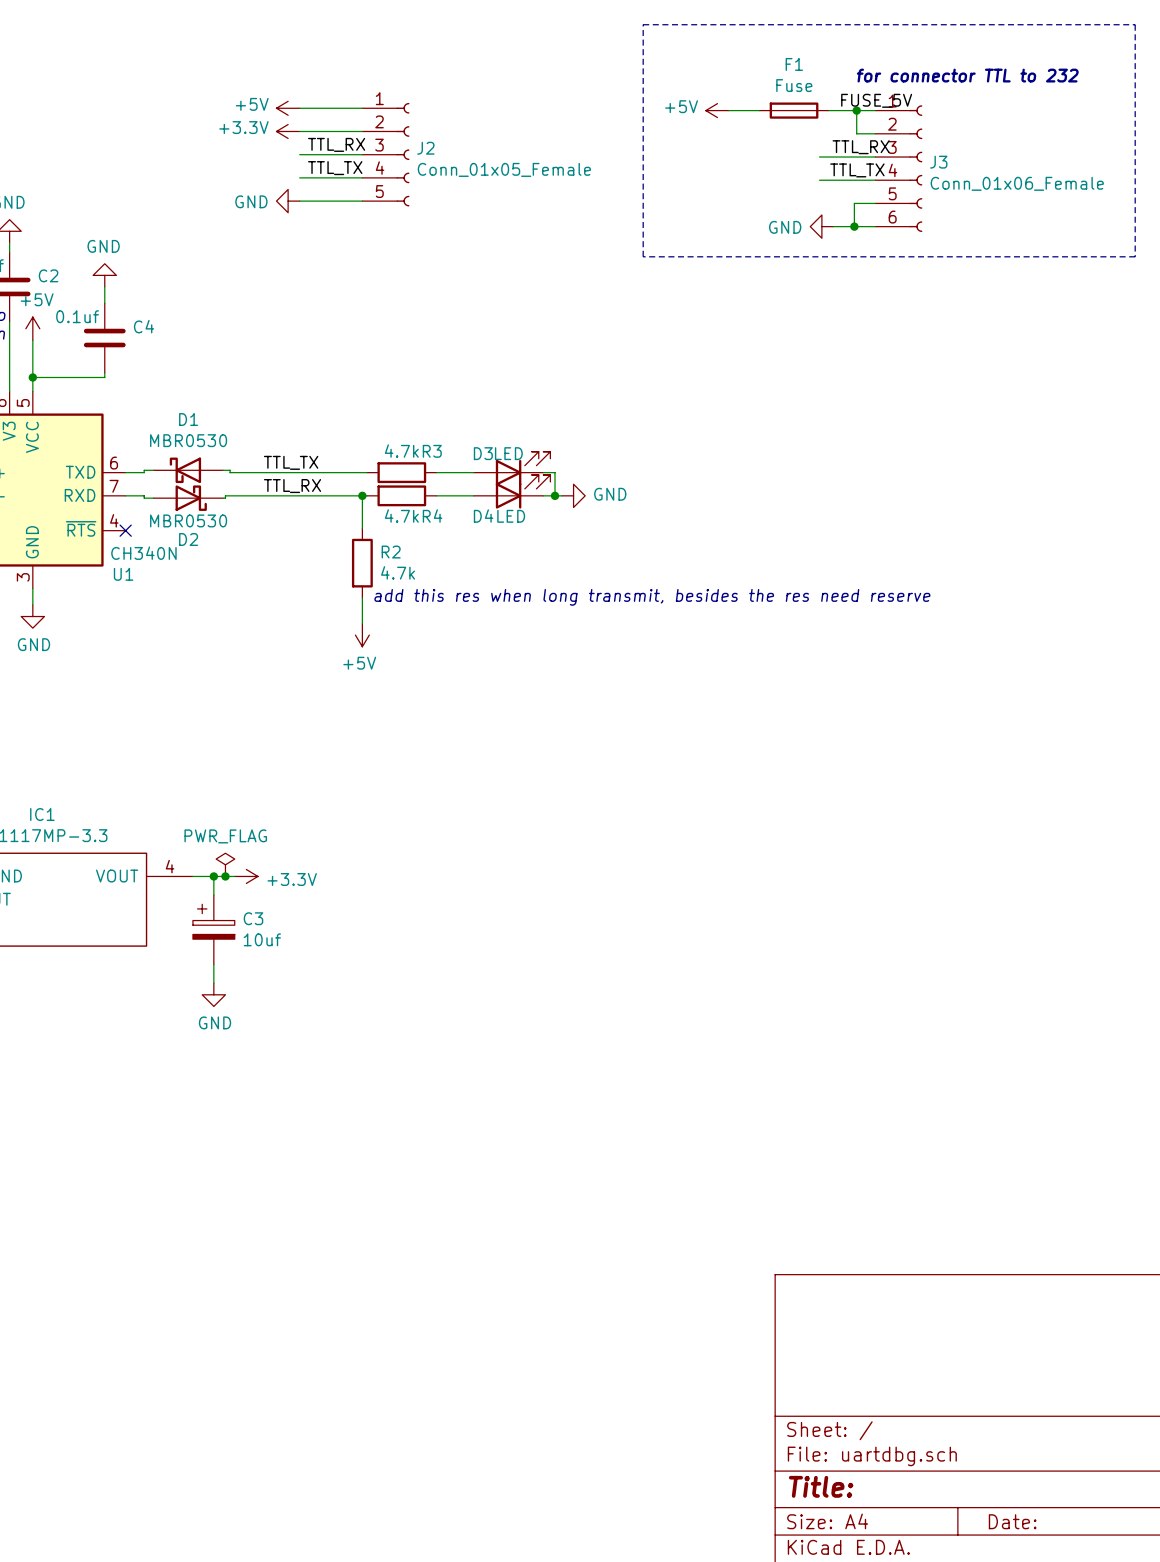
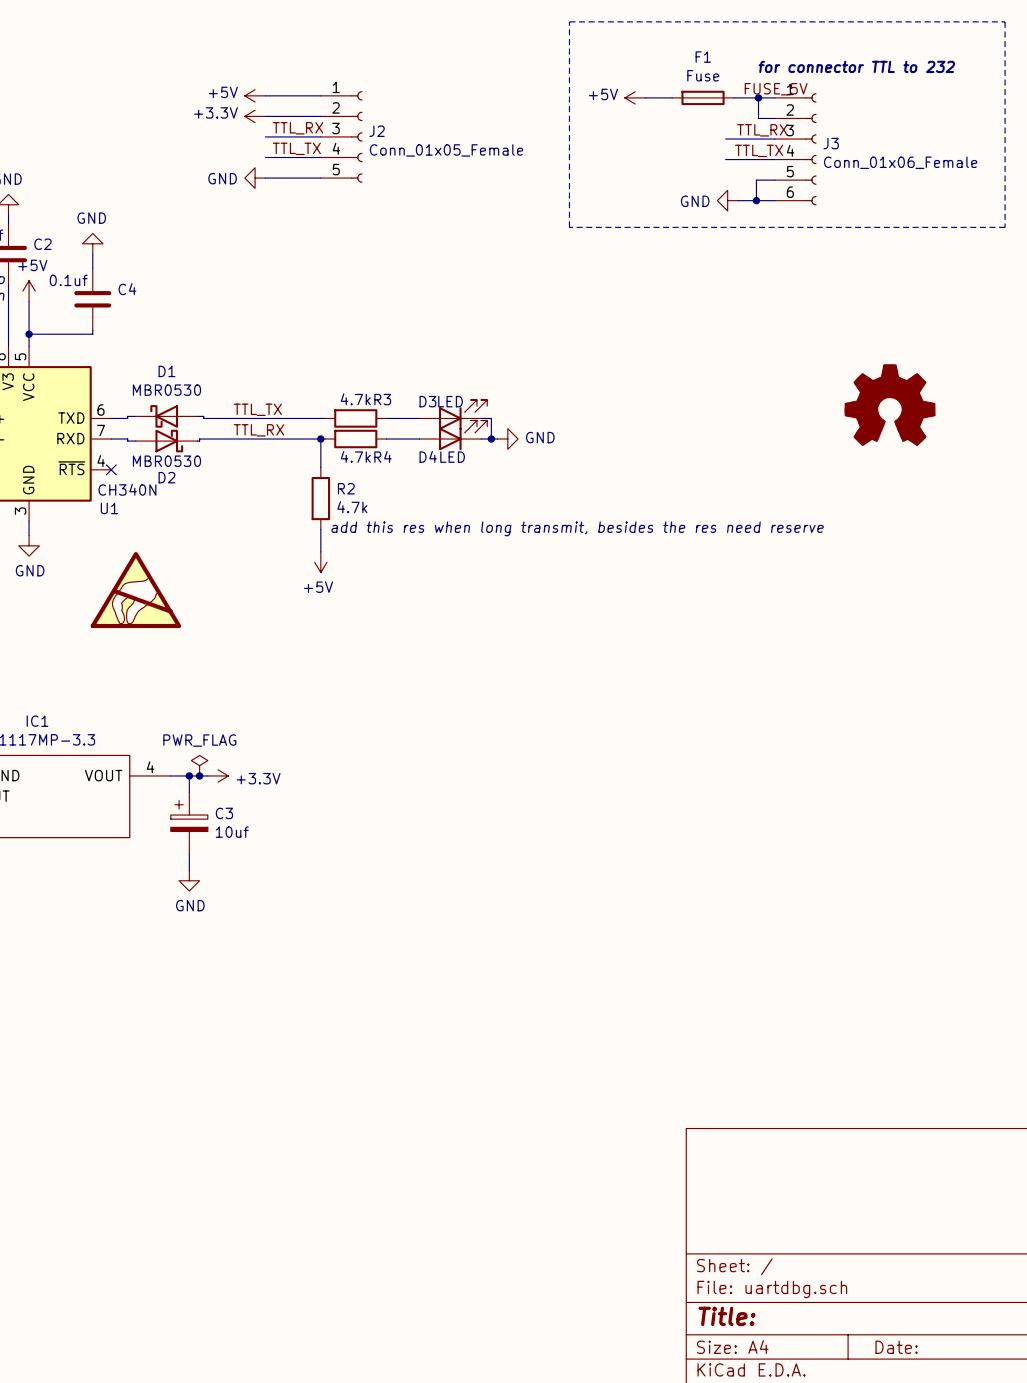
part: none -> (890, 405)
power symbol: none -> (135, 590)

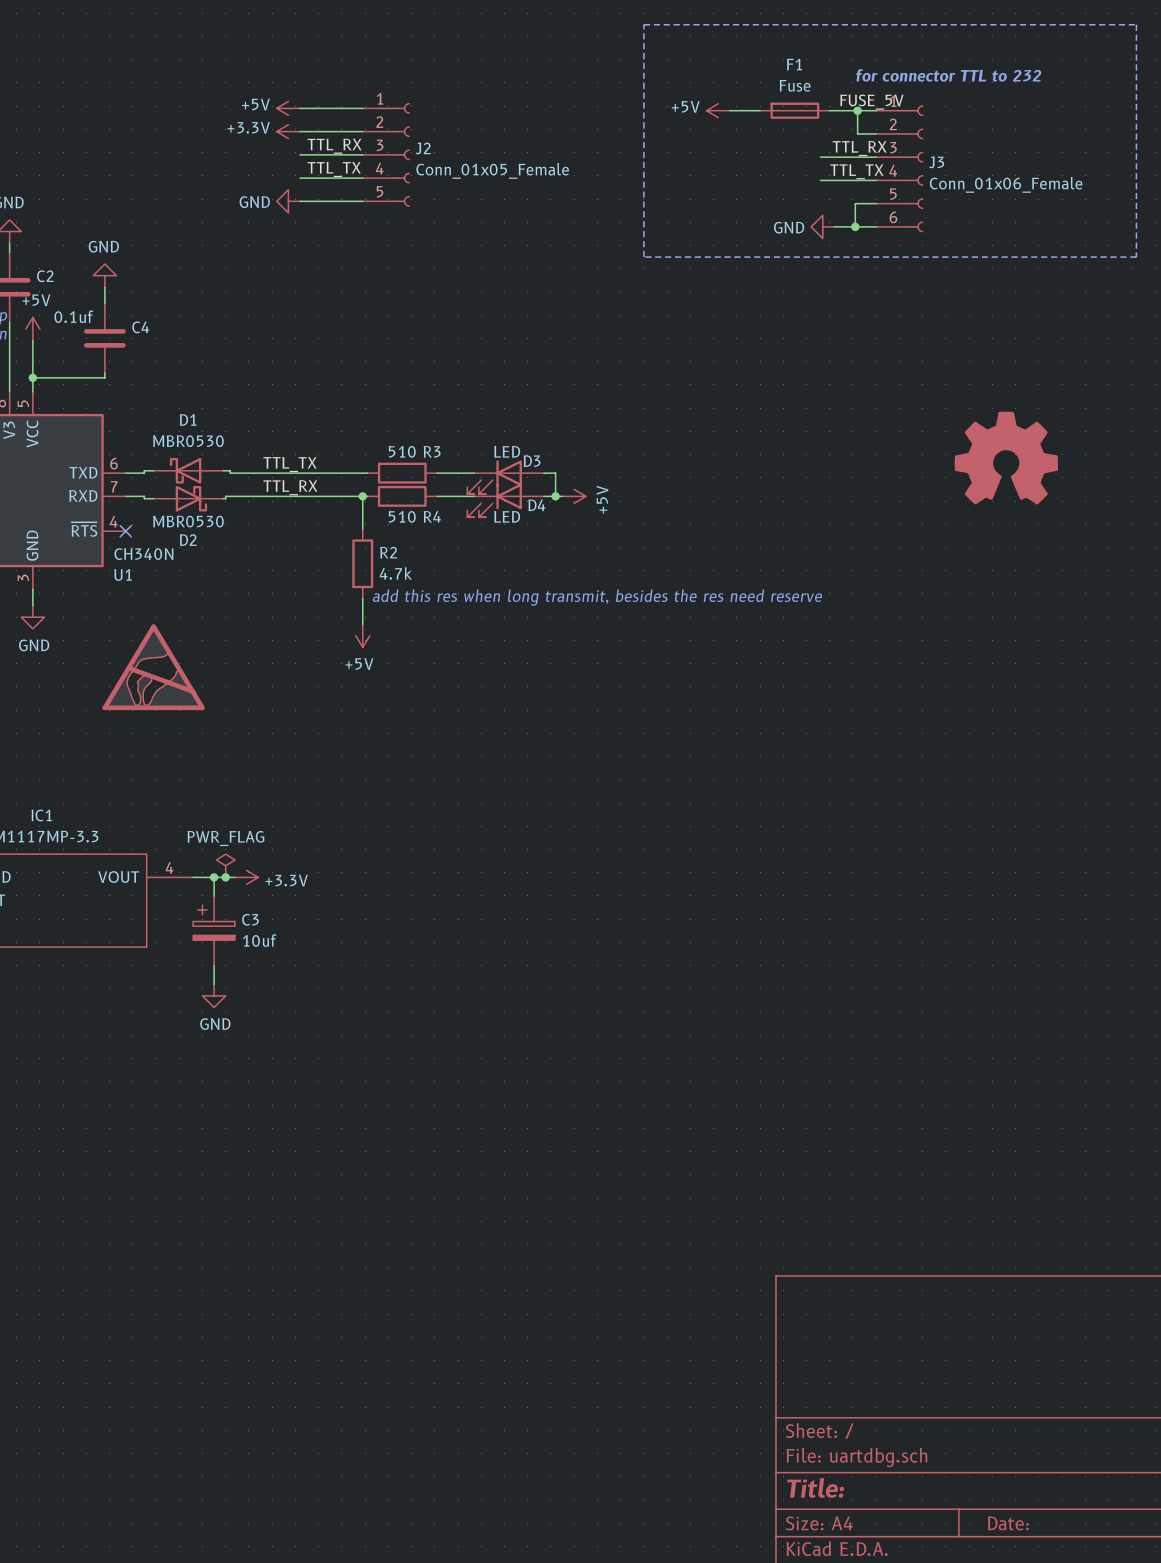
R3 value: 4.7k (355, 399) -> 510 (402, 451)
D3 name position: D3 (427, 401) -> D3 (532, 461)
D3 rotation: 0° (463, 414) -> 180° (494, 477)
D4 rotation: 0° (463, 435) -> 180° (494, 500)
power symbol: GND (507, 439) -> +5V (574, 496)
R4 value: 4.7k (355, 456) -> 510 (402, 516)
D4 name position: D4 (428, 456) -> D4 (536, 505)

